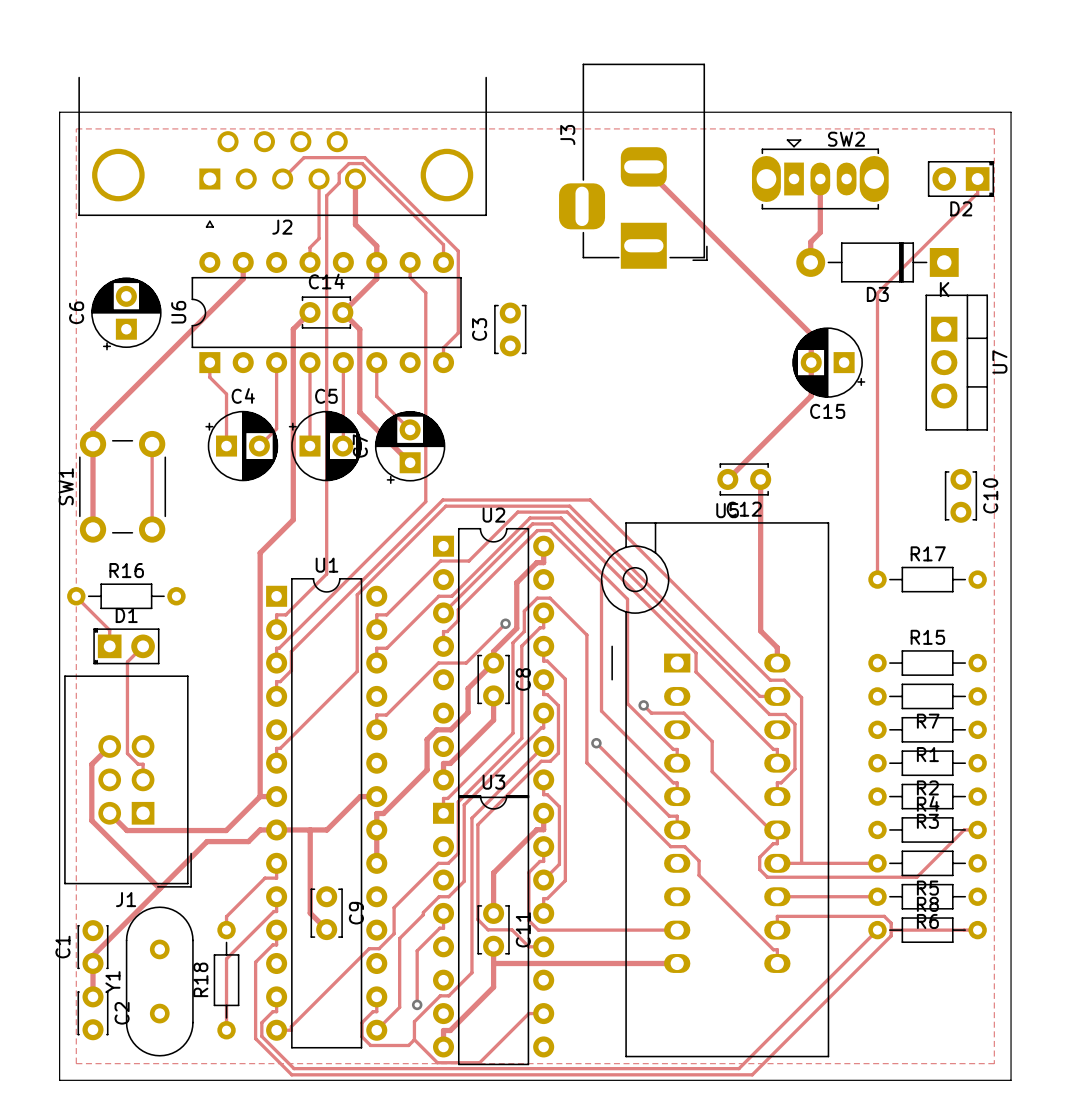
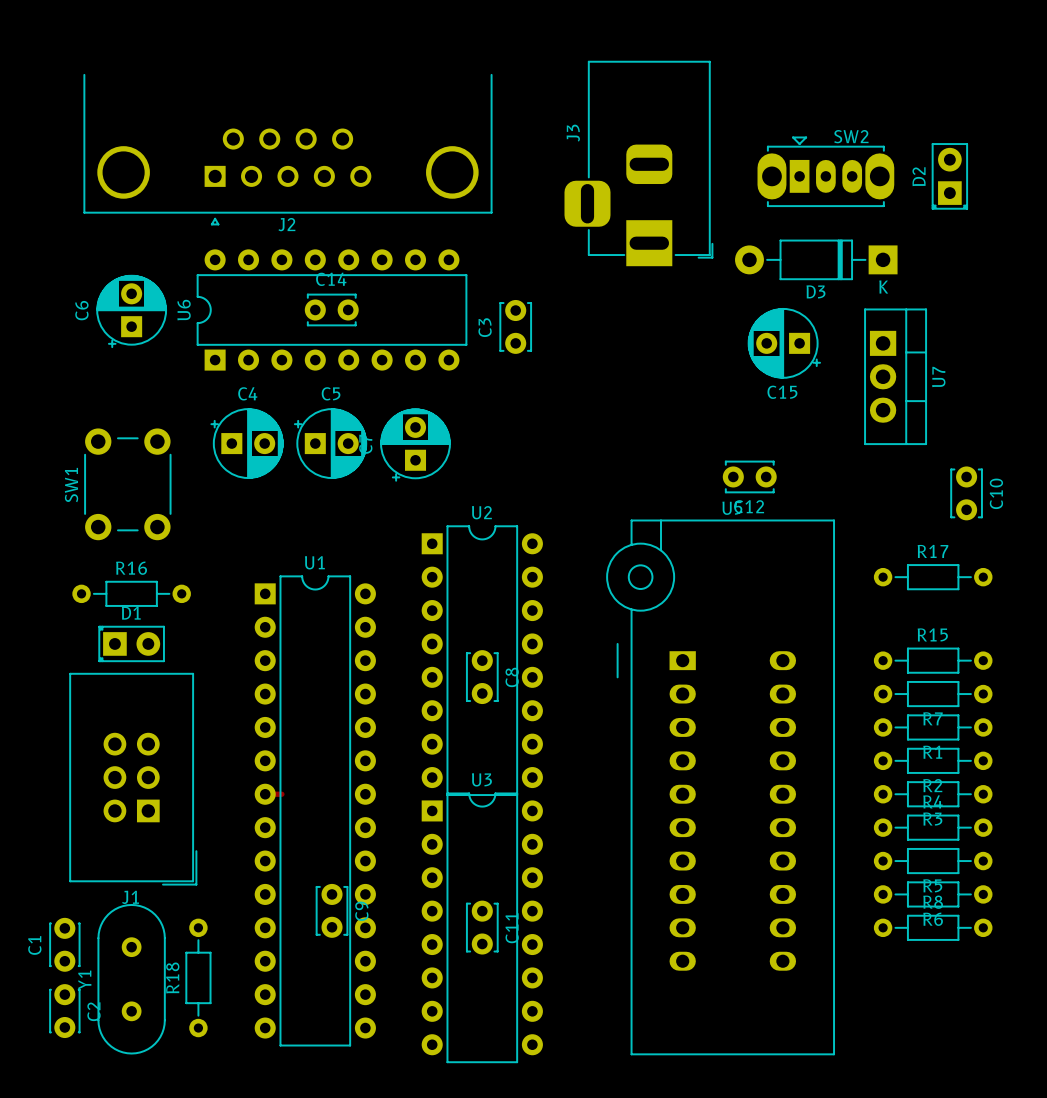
board edge: (59, 112) (1011, 112) (1011, 1080) (59, 1080) (59, 112) -> none
zone outline: (76, 128) (76, 1063) (994, 1063) (994, 128) (76, 128) -> none
track: (643, 166) (811, 334) (811, 395) (727, 479) -> none
track: (282, 178) (304, 157) (364, 157) (458, 251) (458, 333) (443, 347) (443, 362) -> none
track: (319, 178) (319, 238) (309, 247) (309, 262) -> none
track: (355, 178) (355, 224) (376, 246) (376, 278) (342, 312) (359, 329) (359, 412) (410, 462) -> none
track: (820, 178) (820, 232) (810, 242) (810, 262) -> none
D2 rotation: 0° (960, 178) -> 90° clockwise (949, 176)
track: (977, 178) (977, 195) (877, 293) (877, 579) -> none
track: (243, 262) (243, 278) (93, 429) (93, 529) -> none
track: (410, 262) (410, 277) (425, 292) (425, 501) (279, 648) (276, 648) (276, 663) -> none
track: (443, 262) (443, 244) (362, 163) (349, 163) (339, 173) (339, 183) (326, 195) (326, 574) (285, 614) (276, 614) (276, 629) -> none
D3 position: (877, 262) -> (816, 259)
track: (309, 312) (293, 329) (293, 519) (260, 552) (260, 796) (226, 830) (126, 830) (109, 813) -> none
track: (209, 362) (209, 377) (226, 394) (226, 446) -> none
track: (276, 362) (276, 428) (259, 446) -> none
track: (309, 362) (309, 446) -> none
track: (343, 362) (342, 446) -> none
track: (376, 362) (376, 396) (410, 429) -> none
C15 position: (828, 362) -> (784, 343)
U7 position: (956, 362) -> (895, 376)
track: (152, 444) (152, 529) -> none
track: (760, 479) (760, 630) (777, 647) (777, 663) -> none
track: (543, 546) (543, 562) (536, 562) (516, 582) (516, 628) (493, 651) (493, 663) (468, 688) (468, 712) (450, 729) (436, 729) (427, 739) (427, 770) (383, 813) (376, 813) (376, 863) -> none
track: (76, 596) (109, 630) (109, 646) -> none
track: (443, 612) (532, 523) (552, 523) (627, 599) (627, 703) (673, 749) (677, 749) (677, 763) -> none
track: (543, 612) (543, 627) (540, 627) (521, 646) (521, 738) (458, 801) (458, 853) (448, 863) (438, 863) (394, 907) (394, 933) (379, 948) (369, 948) (291, 1026) (291, 1030) (276, 1030) -> none
track: (505, 623) (466, 663) (438, 663) (386, 715) (376, 715) (376, 729) -> none
via: (505, 623) -> none
track: (376, 629) (376, 614) (386, 614) (440, 561) (468, 561) (517, 512) (567, 512) (769, 714) (785, 714) (794, 724) (794, 769) (781, 782) (777, 782) (777, 796) -> none
track: (143, 646) (127, 661) (127, 753) (138, 764) (143, 764) (143, 779) -> none
track: (443, 646) (443, 631) (447, 631) (458, 620) (458, 609) (537, 530) (550, 530) (601, 581) (601, 711) (673, 782) (677, 782) (677, 796) -> none
track: (543, 646) (543, 661) (547, 661) (565, 679) (565, 880) (547, 898) (543, 898) (543, 913) -> none
track: (376, 663) (376, 648) (386, 648) (438, 596) (451, 596) (530, 518) (560, 518) (696, 653) (696, 672) (773, 749) (777, 749) (777, 763) -> none
U2 position: (493, 663) -> (482, 660)
C8 position: (493, 679) -> (482, 677)
track: (543, 679) (543, 694) (547, 694) (558, 705) (558, 753) (550, 761) (541, 761) (477, 824) (477, 919) (488, 929) (511, 929) (528, 946) (543, 946) -> none
track: (493, 695) (493, 720) (450, 763) (443, 763) (443, 779) -> none
track: (276, 696) (276, 681) (280, 681) (291, 670) (291, 651) (442, 500) (590, 500) (770, 680) (784, 680) (801, 697) (801, 863) -> none
track: (777, 696) (759, 696) (569, 506) (445, 506) (357, 594) (357, 671) (280, 748) (276, 748) (276, 763) -> none
track: (643, 705) (651, 713) (683, 713) (712, 741) (712, 771) (777, 836) -> none
via: (643, 705) -> none
track: (543, 713) (543, 727) (541, 727) (464, 805) (464, 881) (448, 896) (439, 896) (399, 938) (399, 1007) (376, 1030) -> none
track: (596, 743) (669, 816) (677, 816) (677, 829) -> none
via: (596, 743) -> none
track: (109, 746) (91, 764) (91, 820) (159, 888) -> none
track: (543, 746) (471, 818) (471, 972) (448, 995) (440, 995) (414, 1021) (414, 1039) -> none
track: (543, 779) (543, 794) (547, 794) (559, 806) (559, 864) (543, 880) -> none
track: (376, 796) (360, 796) (326, 829) (260, 829) (248, 841) (207, 841) (93, 955) (93, 996) -> none
U1 position: (326, 813) -> (315, 810)
track: (443, 813) (443, 798) (447, 798) (512, 733) (512, 642) (524, 631) (524, 611) (537, 598) (550, 598) (586, 635) (586, 762) (670, 846) (684, 846) (699, 860) (699, 875) (773, 949) (777, 949) (777, 963) -> none
track: (543, 813) (543, 829) (536, 829) (493, 872) (493, 913) -> none
track: (310, 829) (310, 913) (326, 929) -> none
track: (777, 829) (777, 843) (773, 843) (759, 857) (759, 869) (767, 877) (916, 877) (964, 829) (977, 829) -> none
track: (543, 846) (543, 861) (539, 861) (528, 872) (528, 920) (538, 930) (677, 930) -> none
track: (276, 863) (276, 878) (265, 878) (226, 916) (226, 930) -> none
track: (777, 863) (877, 863) -> none
track: (276, 896) (276, 911) (273, 911) (226, 958) (226, 1030) -> none
track: (777, 896) (877, 896) -> none
track: (443, 913) (443, 928) (439, 928) (417, 950) (417, 1004) -> none
C11 position: (493, 929) -> (482, 927)
track: (276, 930) (276, 944) (272, 944) (255, 962) (255, 1038) (291, 1074) (752, 1074) (891, 935) (891, 923) (884, 916) (777, 916) (777, 930) -> none
U3 position: (493, 930) -> (482, 927)
track: (877, 930) (738, 1068) (294, 1068) (261, 1036) (261, 1022) (272, 1011) (276, 1011) (276, 996) -> none
track: (891, 930) (977, 930) -> none
track: (493, 946) (493, 987) (450, 1030) (443, 1030) (443, 1046) -> none
C1 position: (93, 947) -> (64, 944)
track: (493, 963) (677, 963) -> none
R18 position: (226, 980) -> (198, 977)
Y1 position: (159, 981) -> (131, 979)
track: (376, 996) (376, 1011) (373, 1011) (361, 1022) (361, 1036) (370, 1045) (408, 1045) (414, 1039) -> none
via: (417, 1004) -> none
C2 position: (93, 1013) -> (64, 1011)
track: (543, 1013) (528, 1013) (479, 1062) (437, 1062) (414, 1039) -> none

